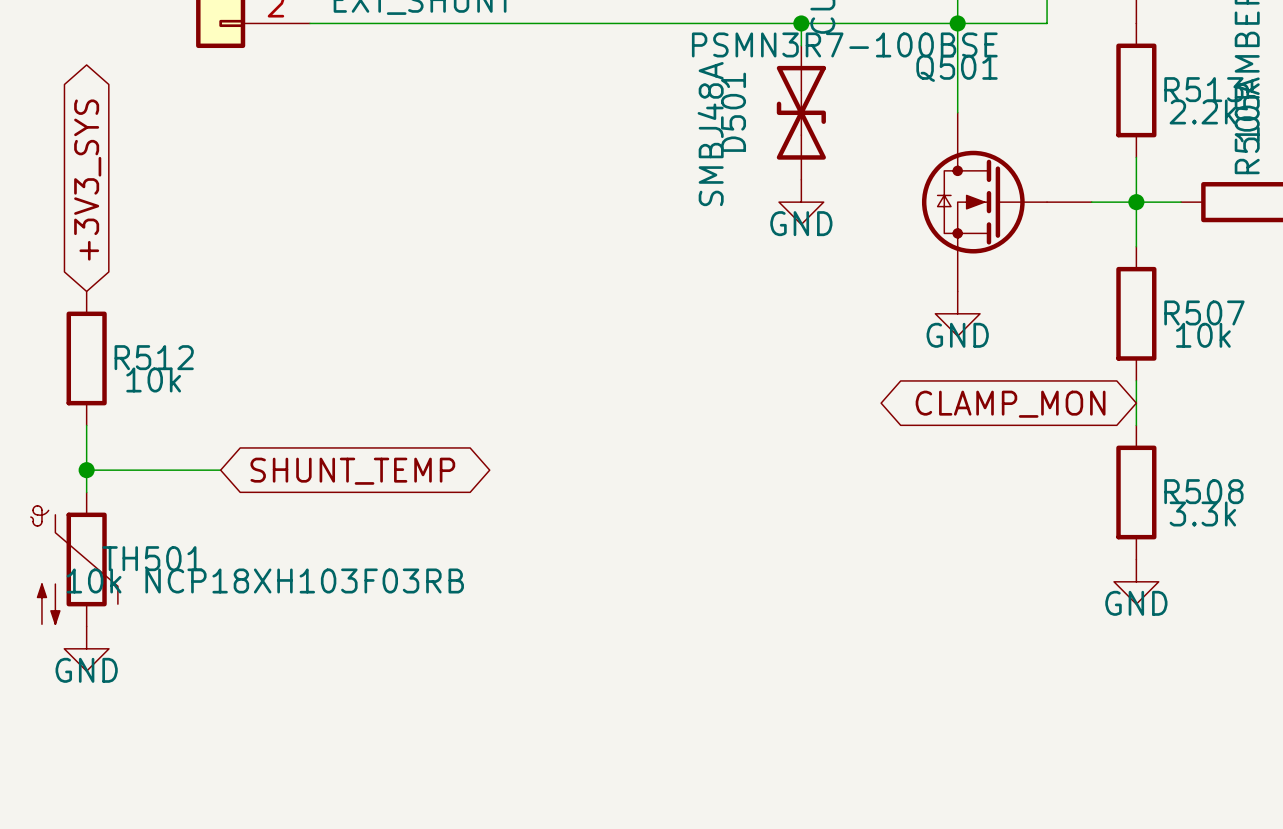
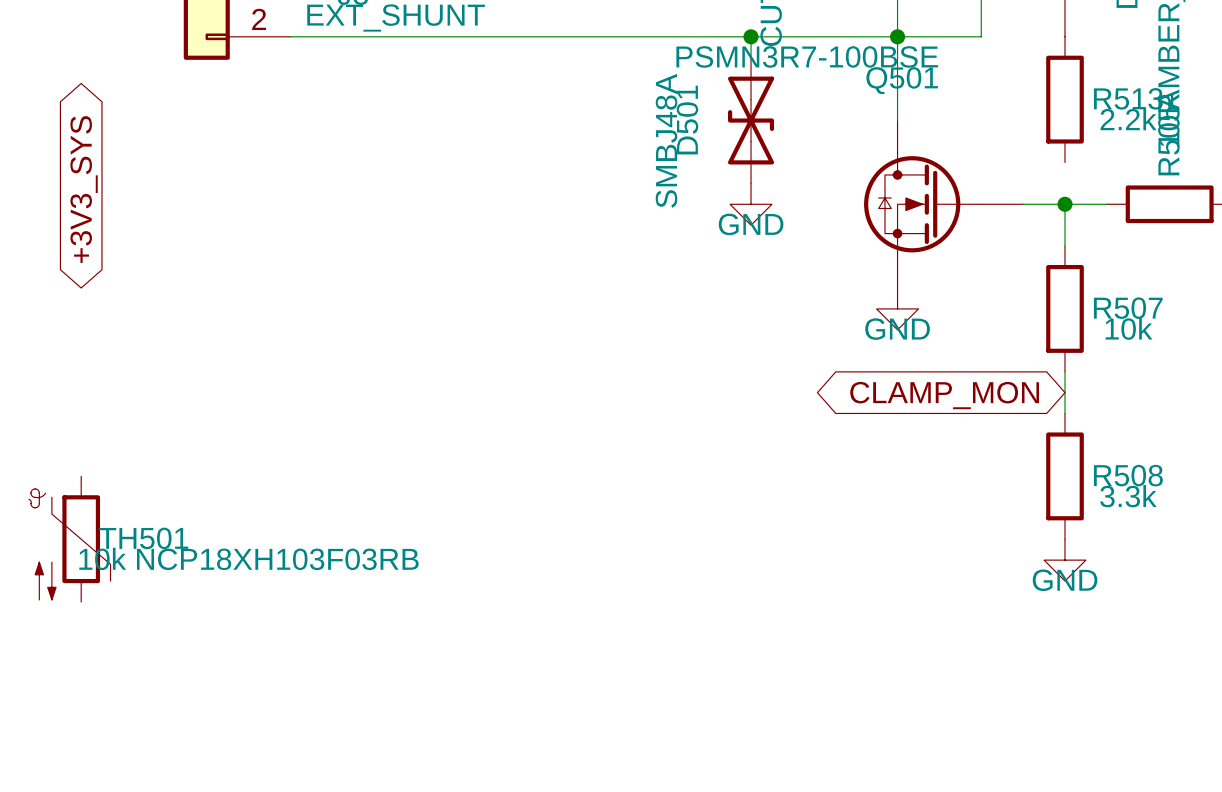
wire: (1136, 157) (1136, 202) -> none
R512: 10k (86, 358) -> none
wire: (86, 425) (86, 492) -> none
wire: (86, 470) (220, 470) -> none
junction: (86, 470) -> none
global label: SHUNT_TEMP (352, 471) -> none
power symbol: GND (86, 648) -> none

